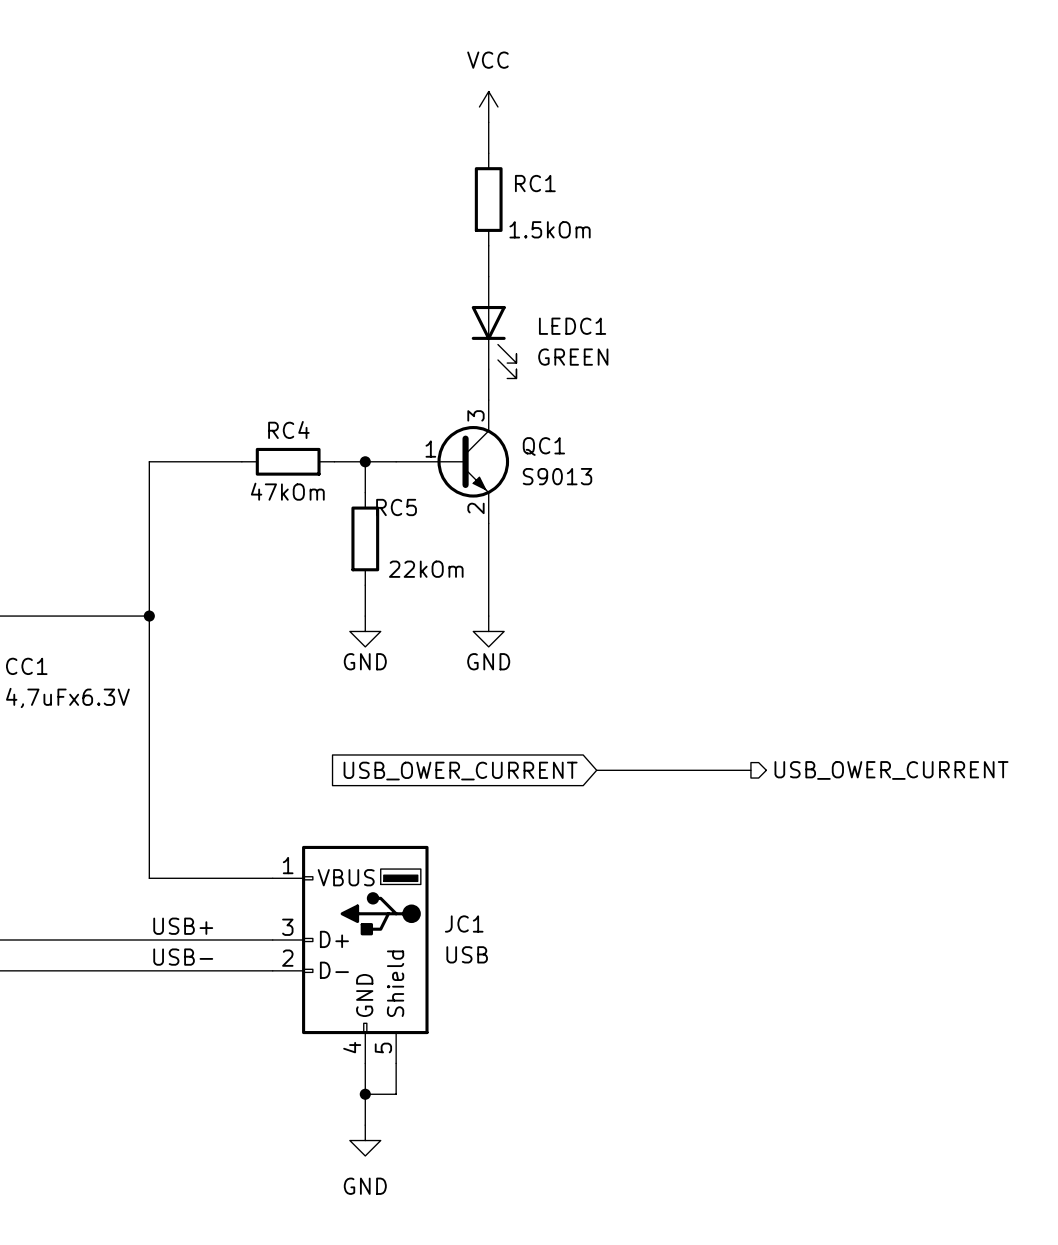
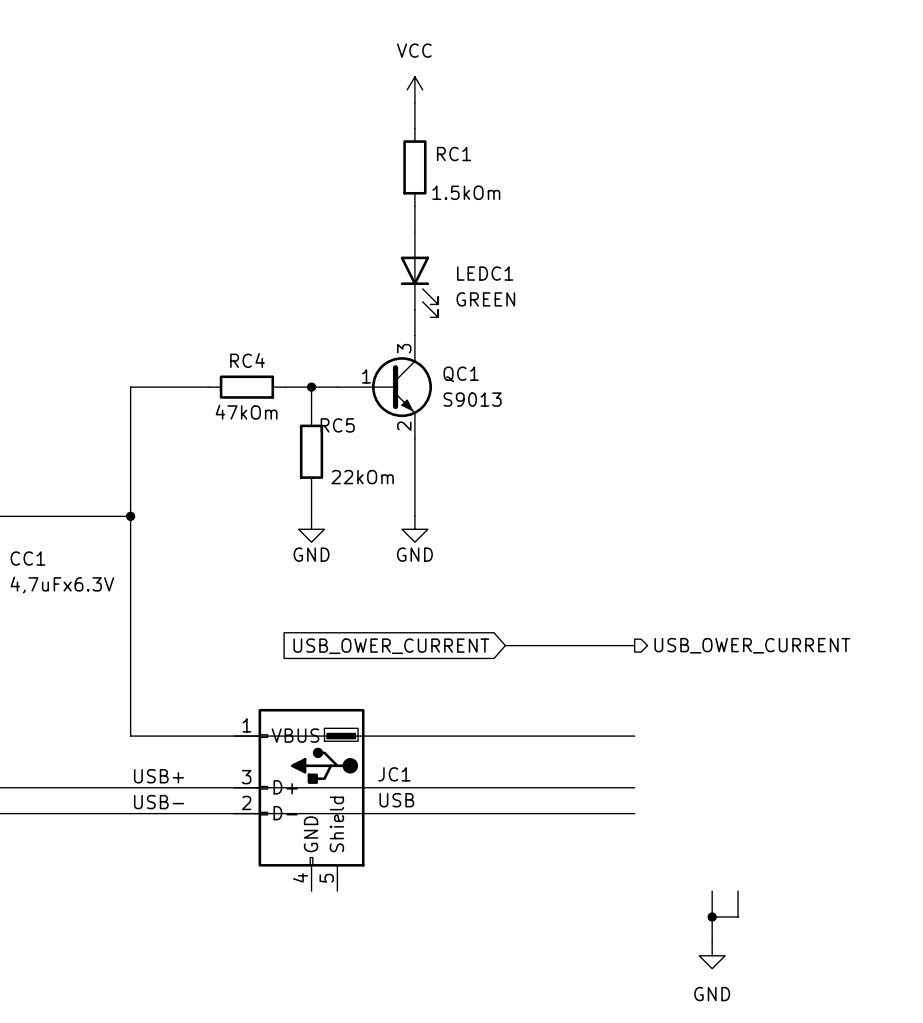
wire: none -> (233, 736) (634, 736)
wire: none -> (233, 787) (634, 787)
wire: none -> (233, 813) (634, 813)
wire: (365, 1063) (365, 1125) -> none
wire: (396, 1063) (396, 1094) (365, 1094) -> none
wire: none -> (712, 891) (712, 942)
wire: none -> (738, 891) (738, 917) (712, 917)
junction: (365, 1094) -> none
junction: none -> (712, 917)
power symbol: GND (365, 1140) -> none
power symbol: none -> GND (712, 955)

